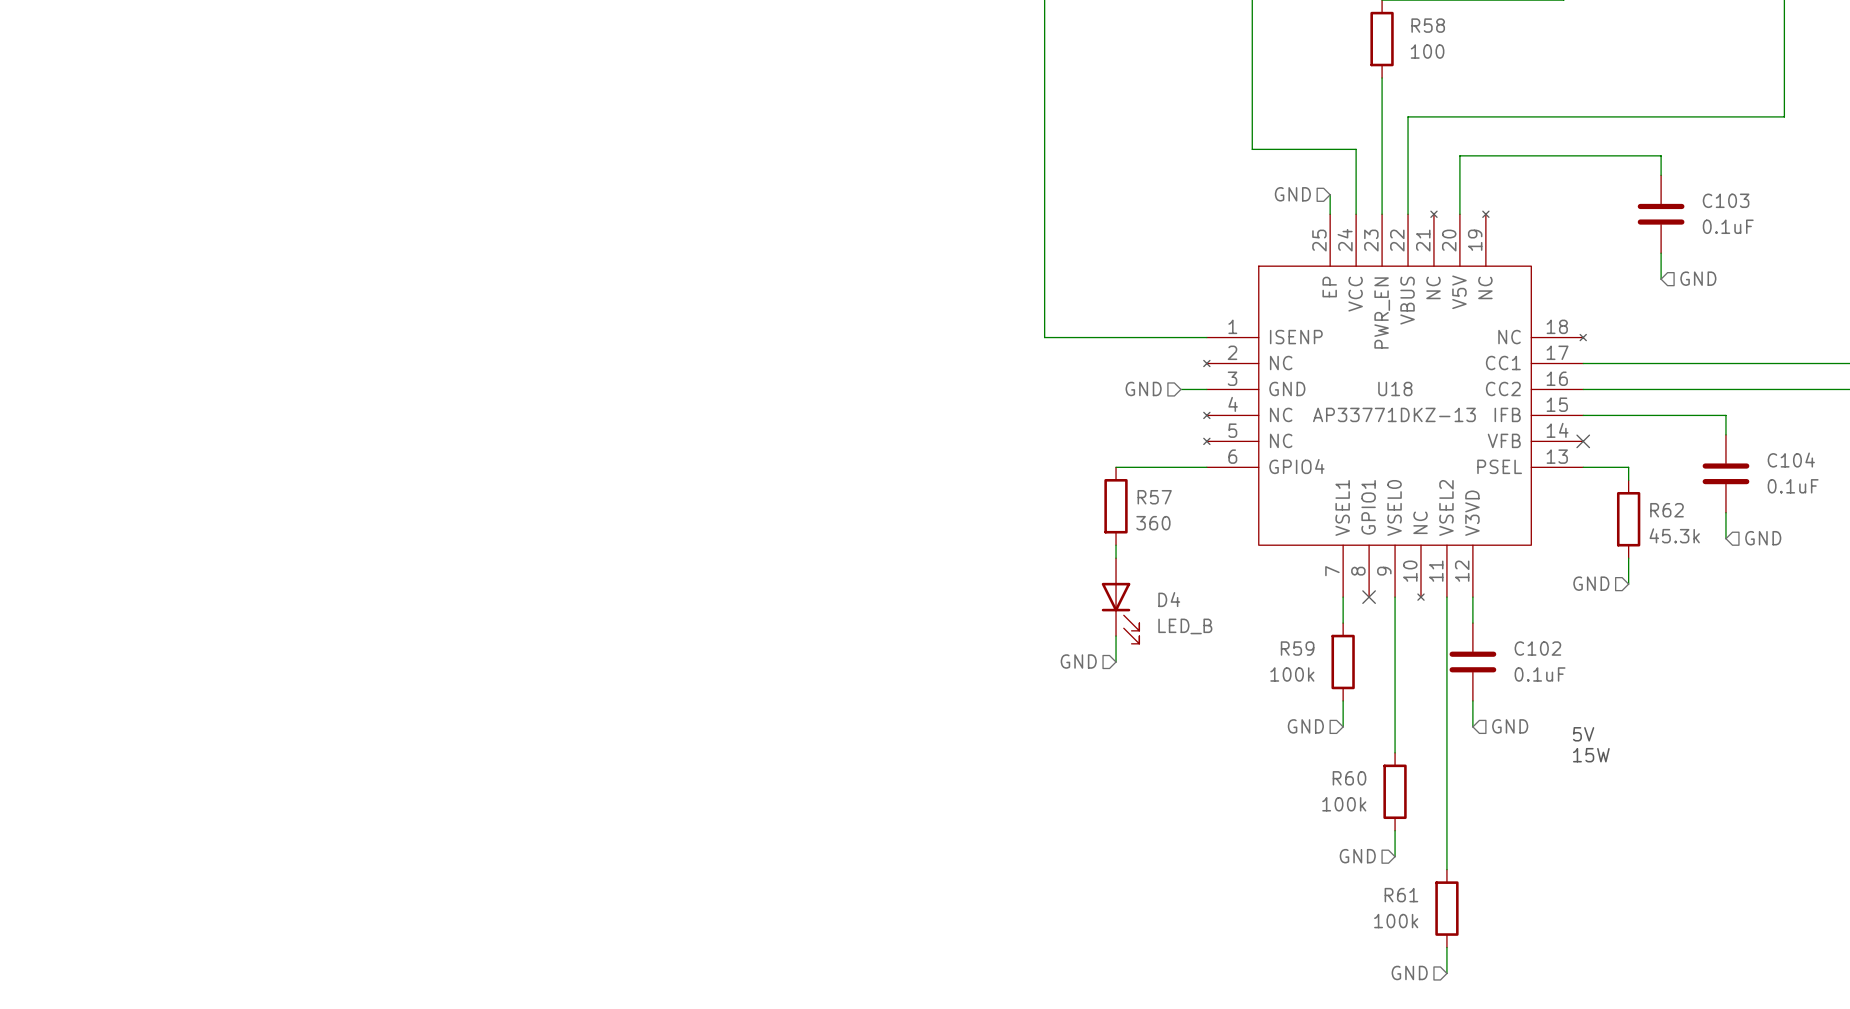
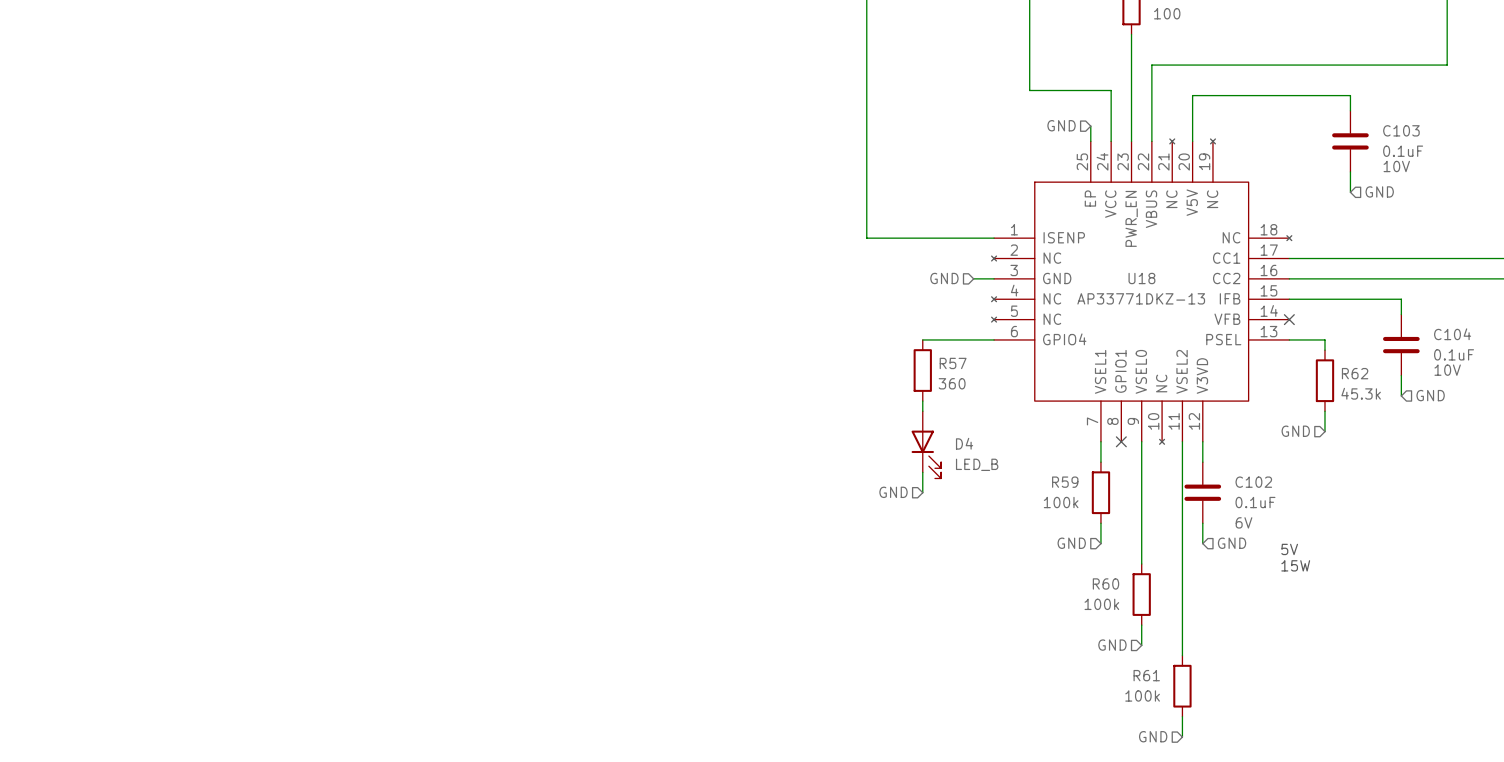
C103 text: none -> 10V (1396, 166)
C104 text: none -> 10V (1447, 370)
C102 text: none -> 6V (1244, 522)

